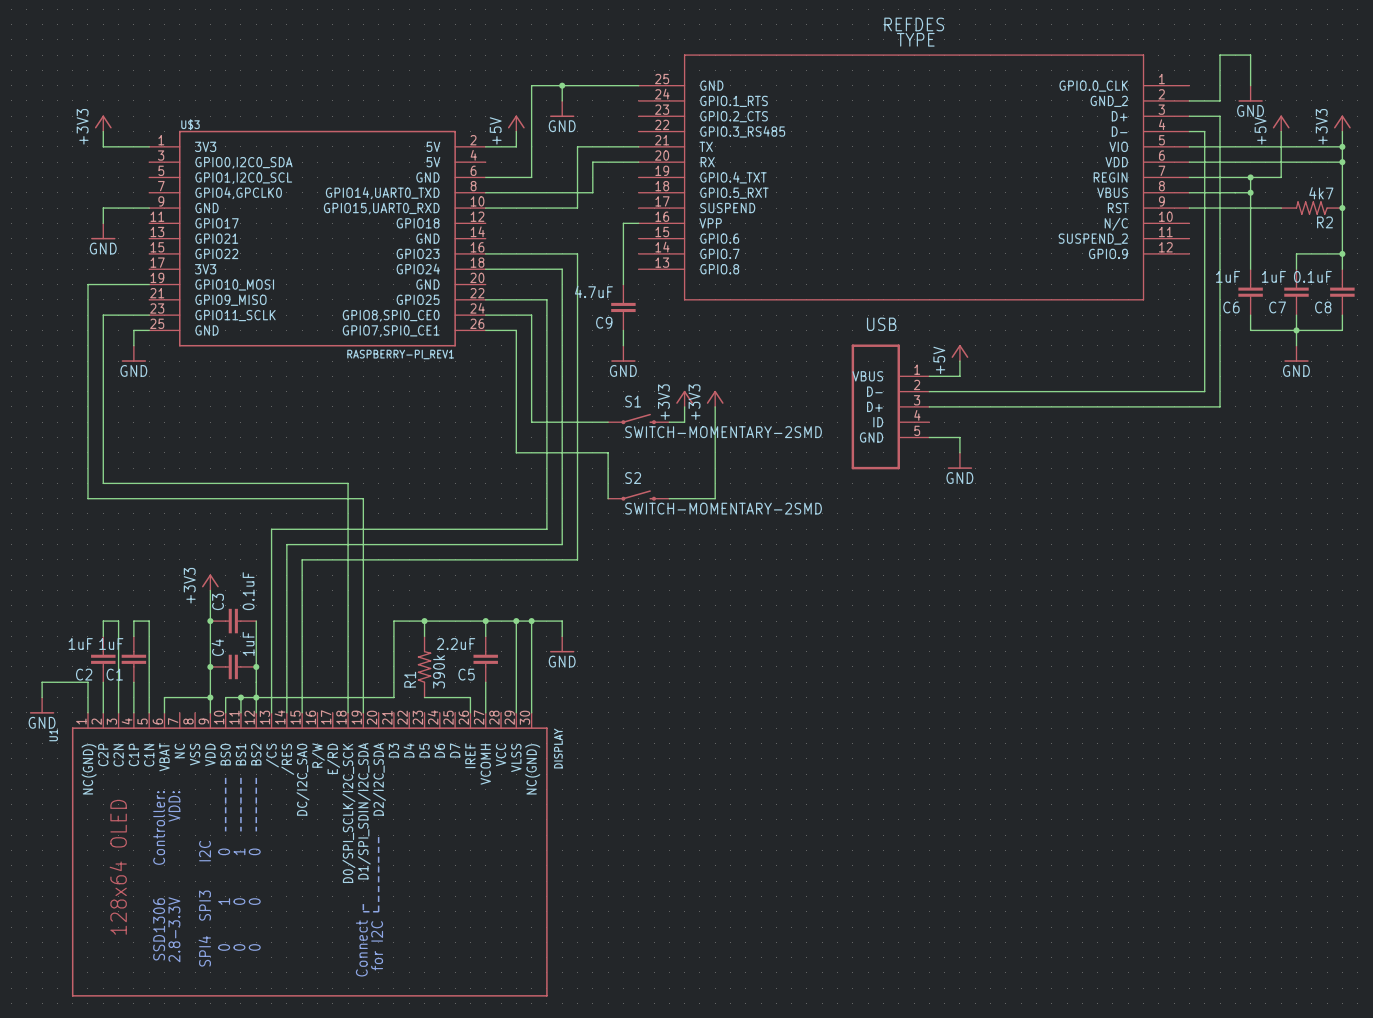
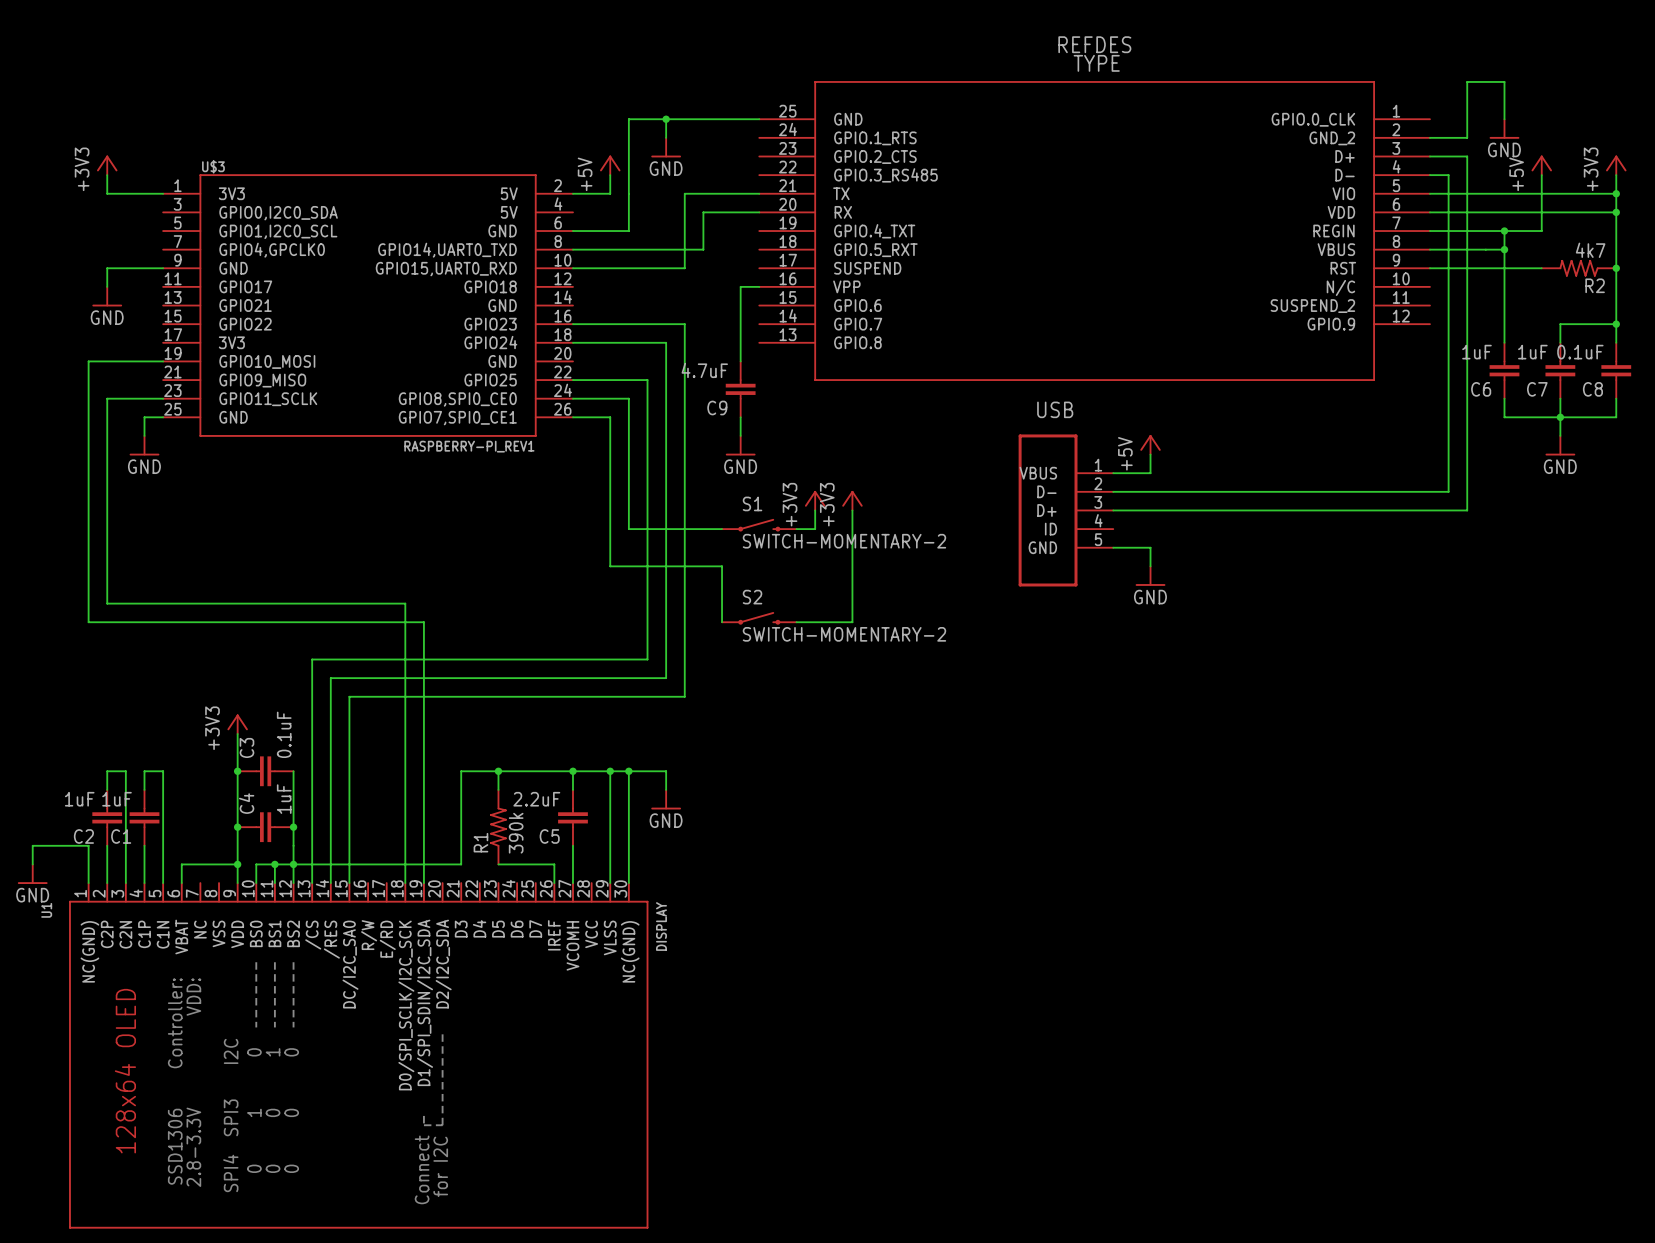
S1 value: SWITCH-MOMENTARY-2SMD (723, 432) -> SWITCH-MOMENTARY-2 (844, 541)
S2 value: SWITCH-MOMENTARY-2SMD (723, 508) -> SWITCH-MOMENTARY-2 (844, 634)

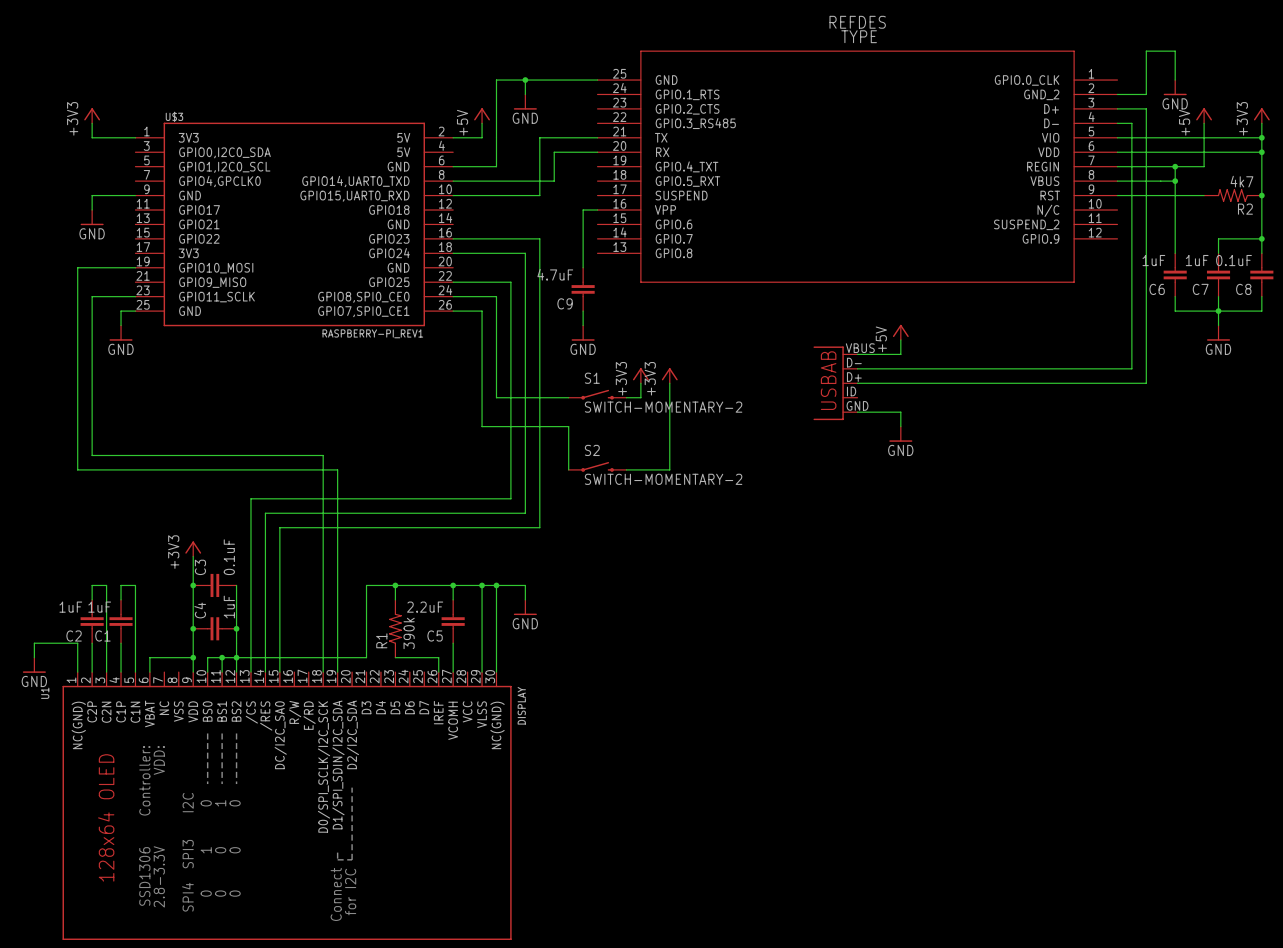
USB: (1065, 510) -> none
part: none -> (835, 383)

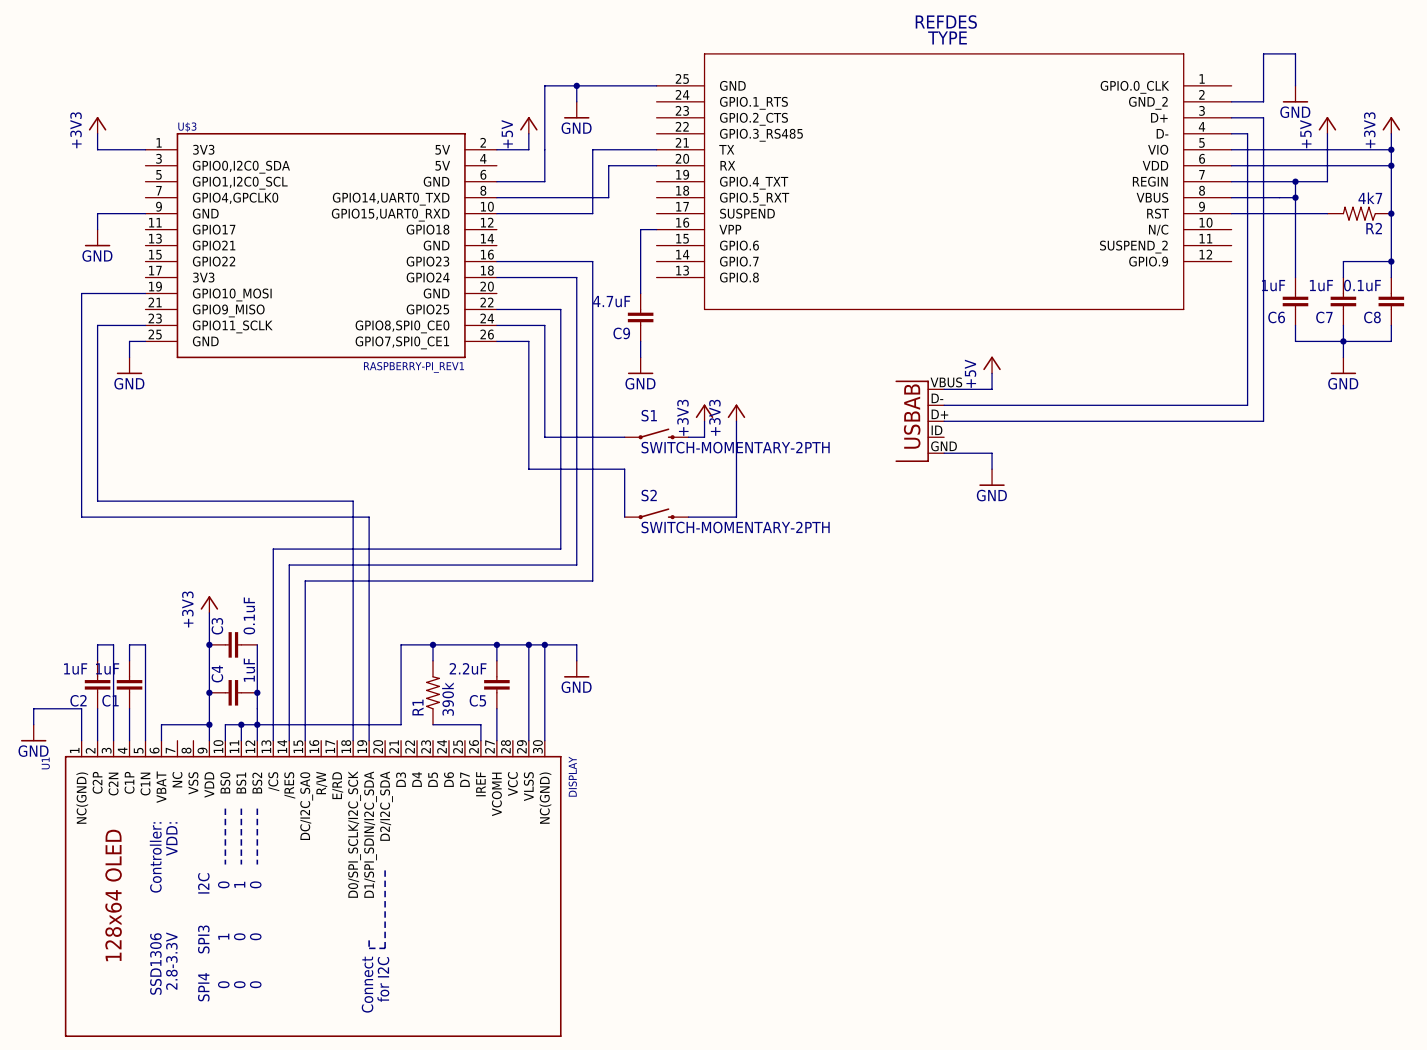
S1 value: SWITCH-MOMENTARY-2 (663, 407) -> SWITCH-MOMENTARY-2PTH (735, 447)
S2 value: SWITCH-MOMENTARY-2 (663, 479) -> SWITCH-MOMENTARY-2PTH (735, 527)

